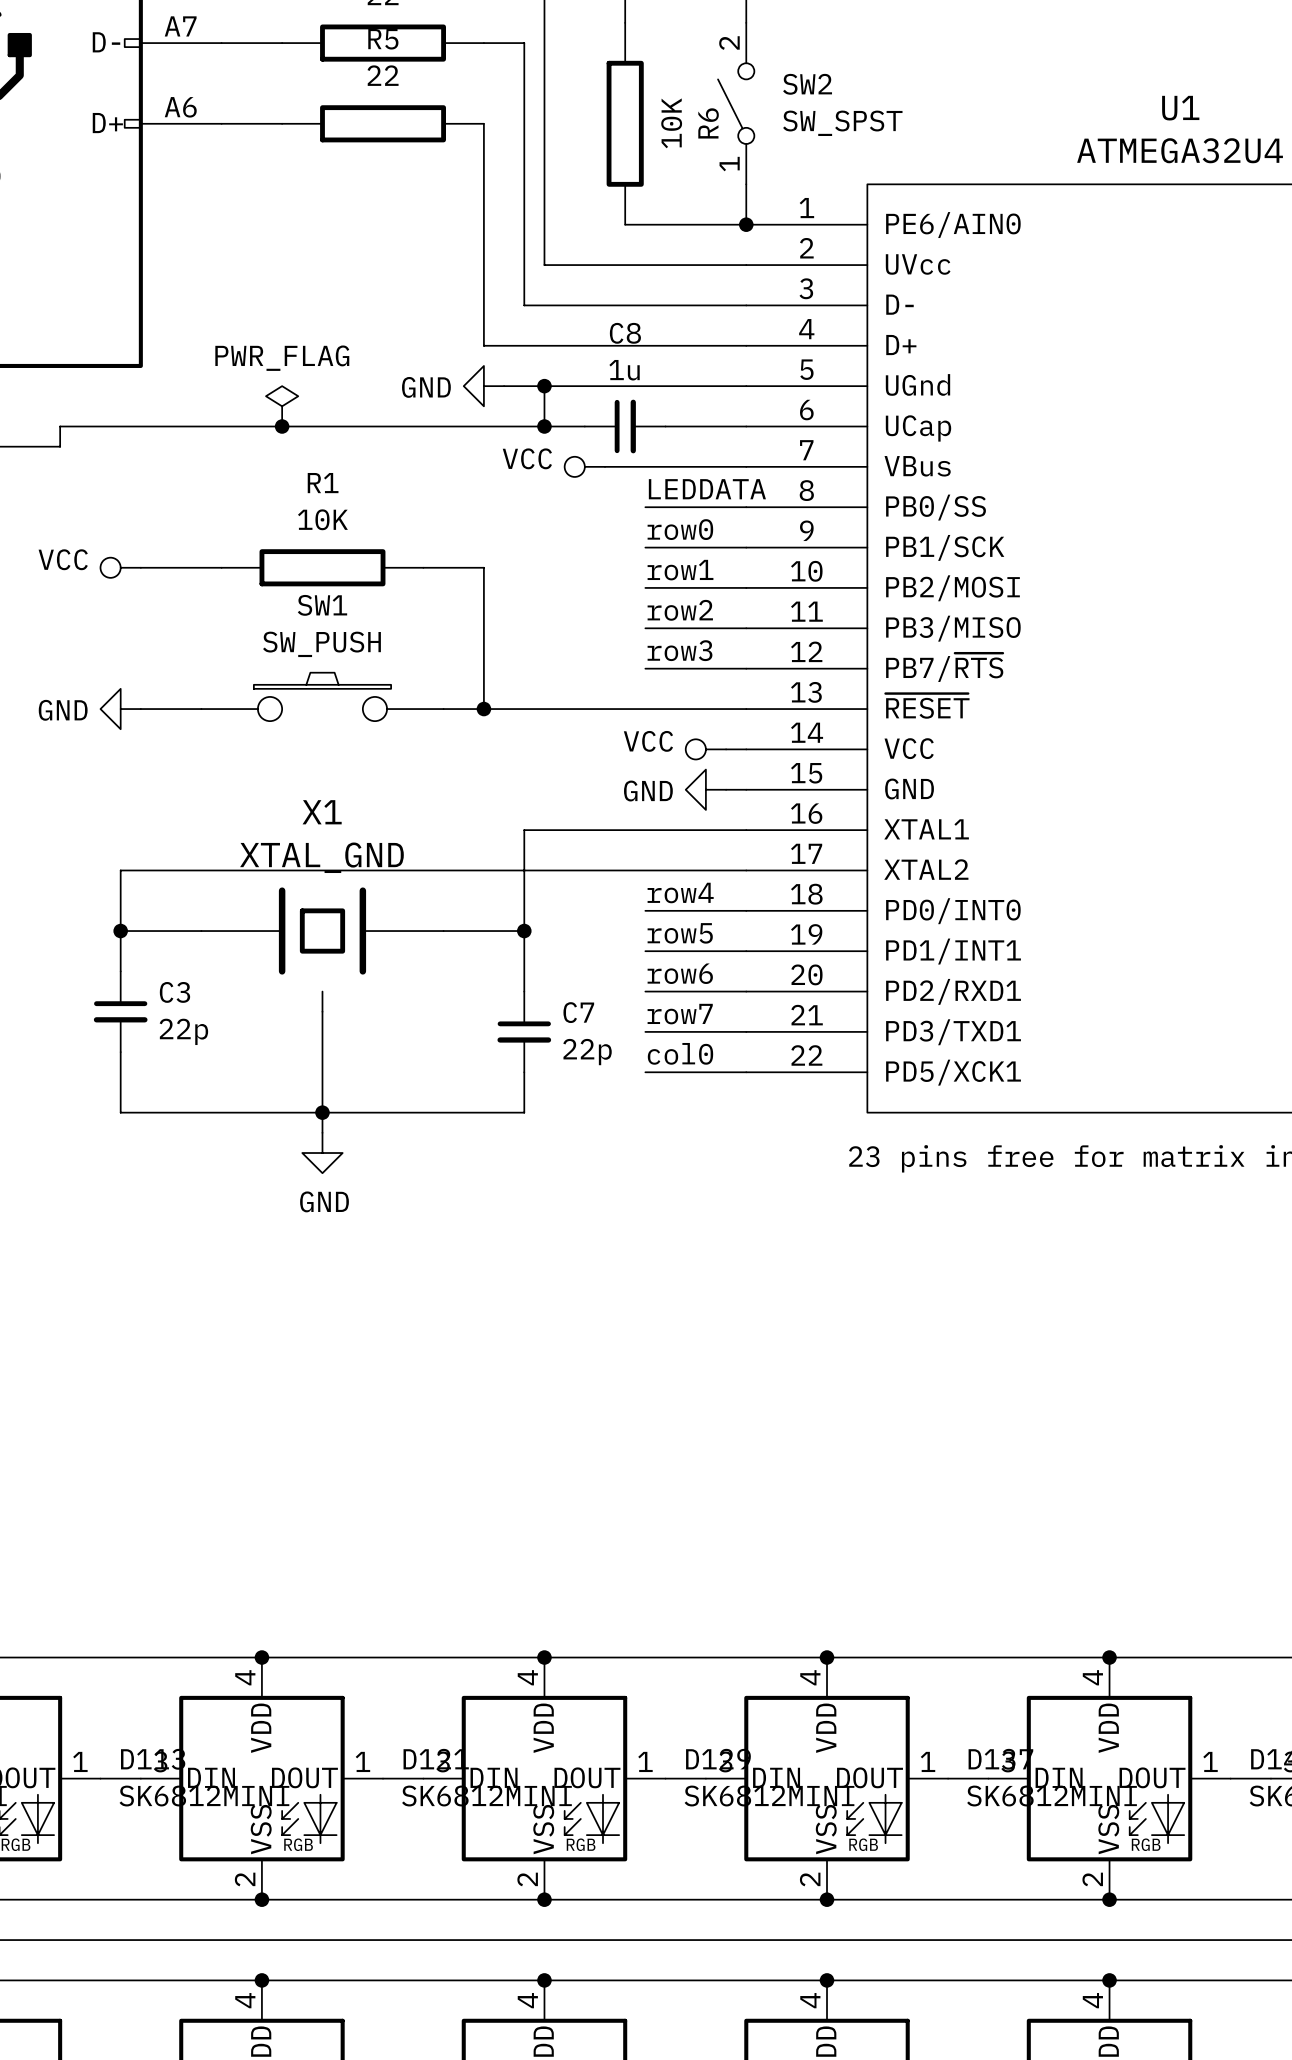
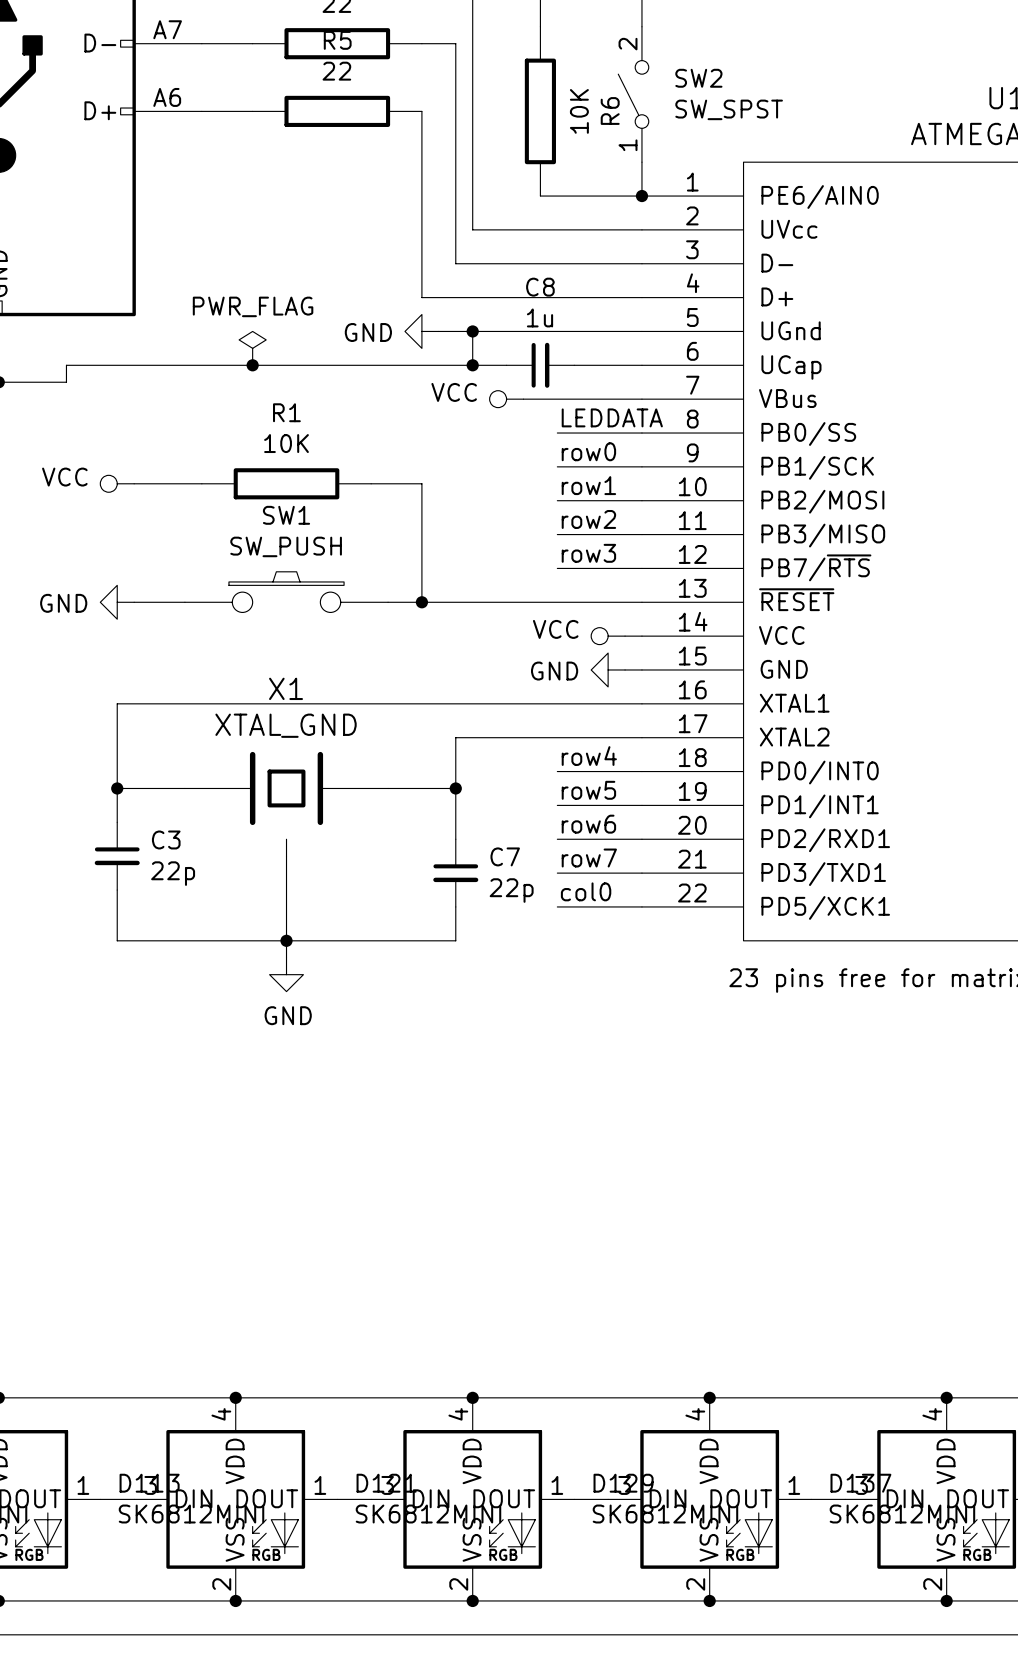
wire: (524, 830) (524, 870) (120, 870) -> (455, 703) (117, 703) (117, 737)

